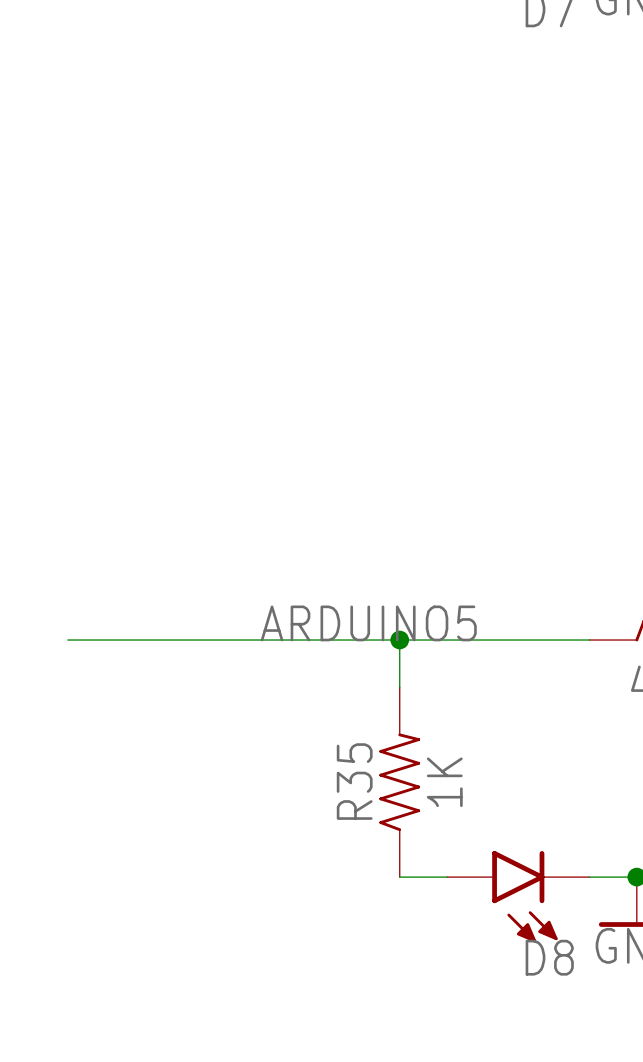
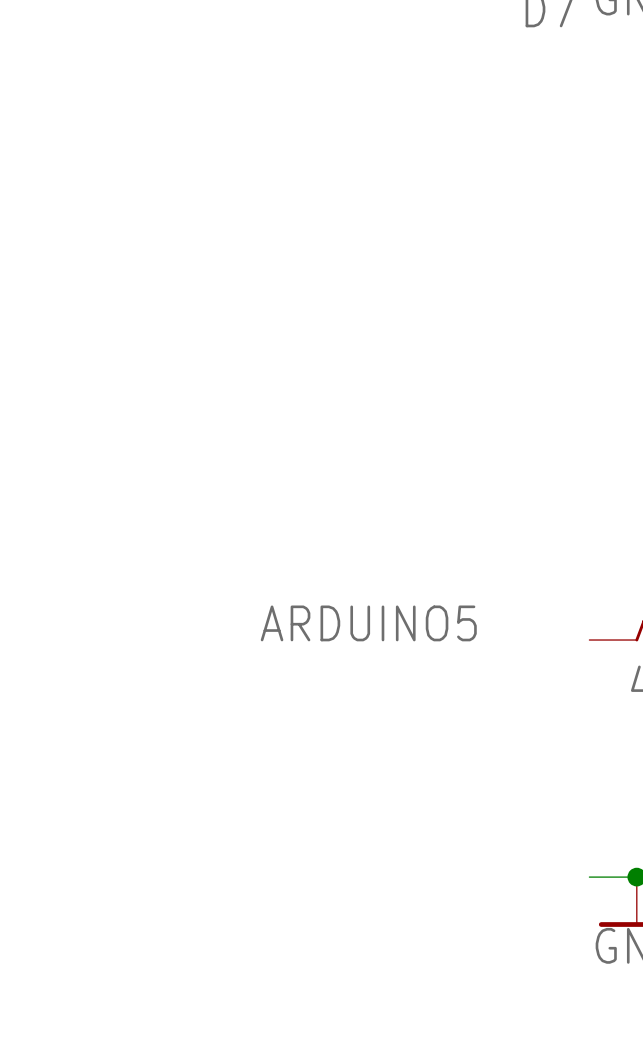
wire: (67, 640) (589, 640) -> none
wire: (399, 640) (399, 687) -> none
junction: (399, 640) -> none
R35: 1K (399, 782) -> none
wire: (399, 877) (447, 877) -> none
D8: (518, 896) -> none

